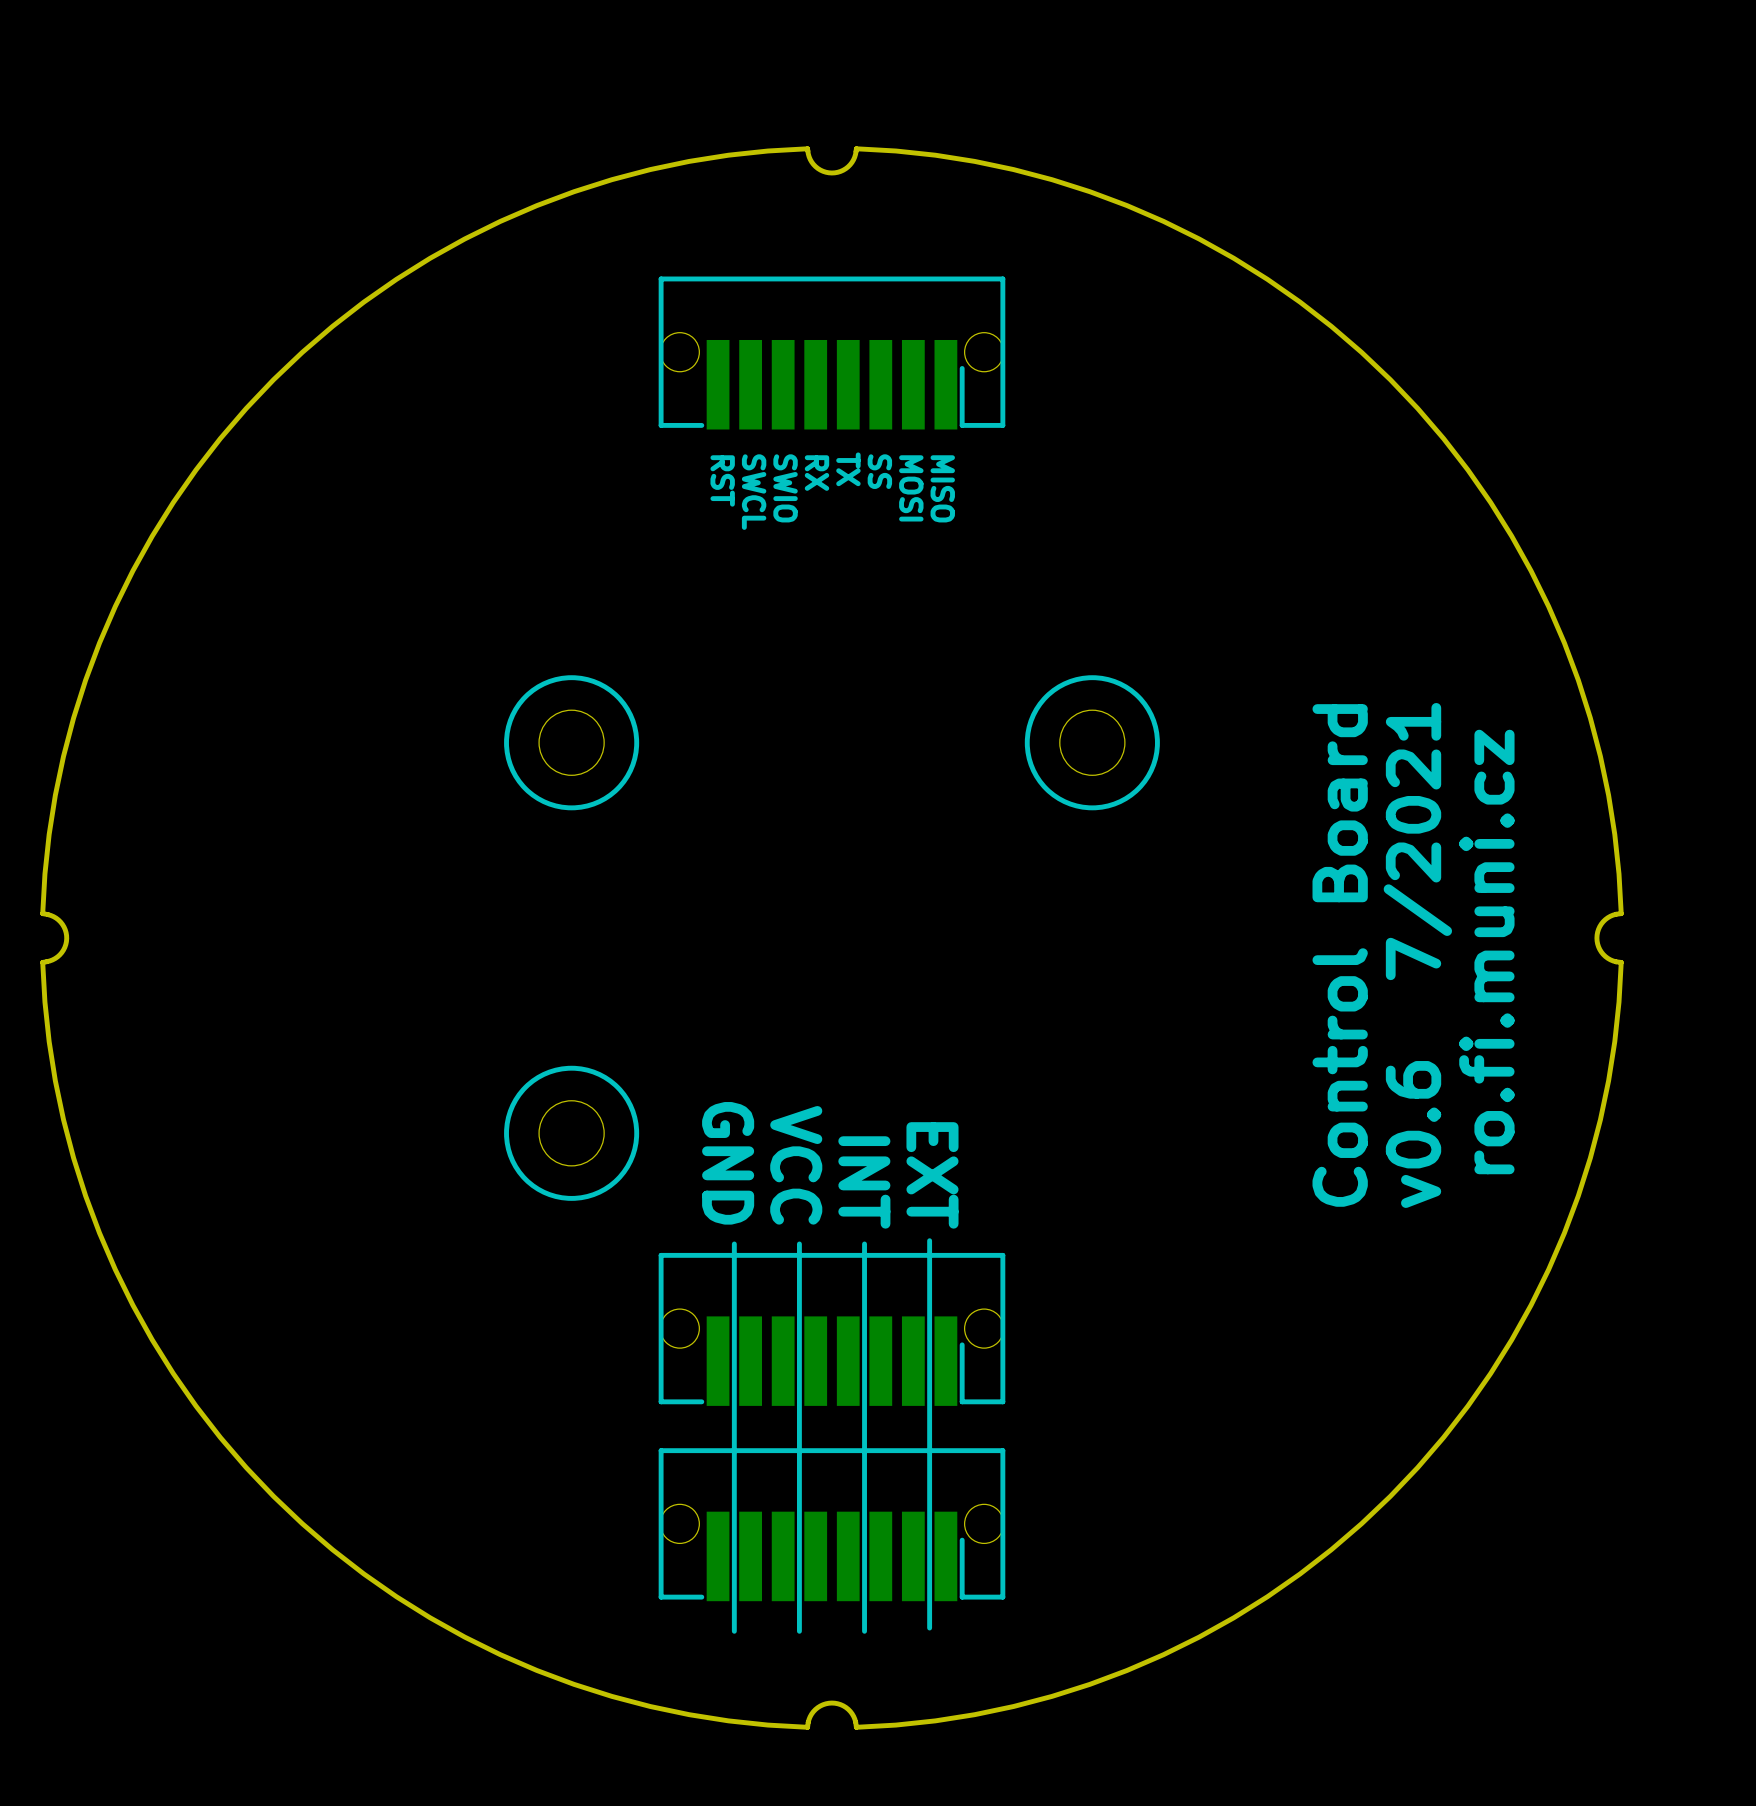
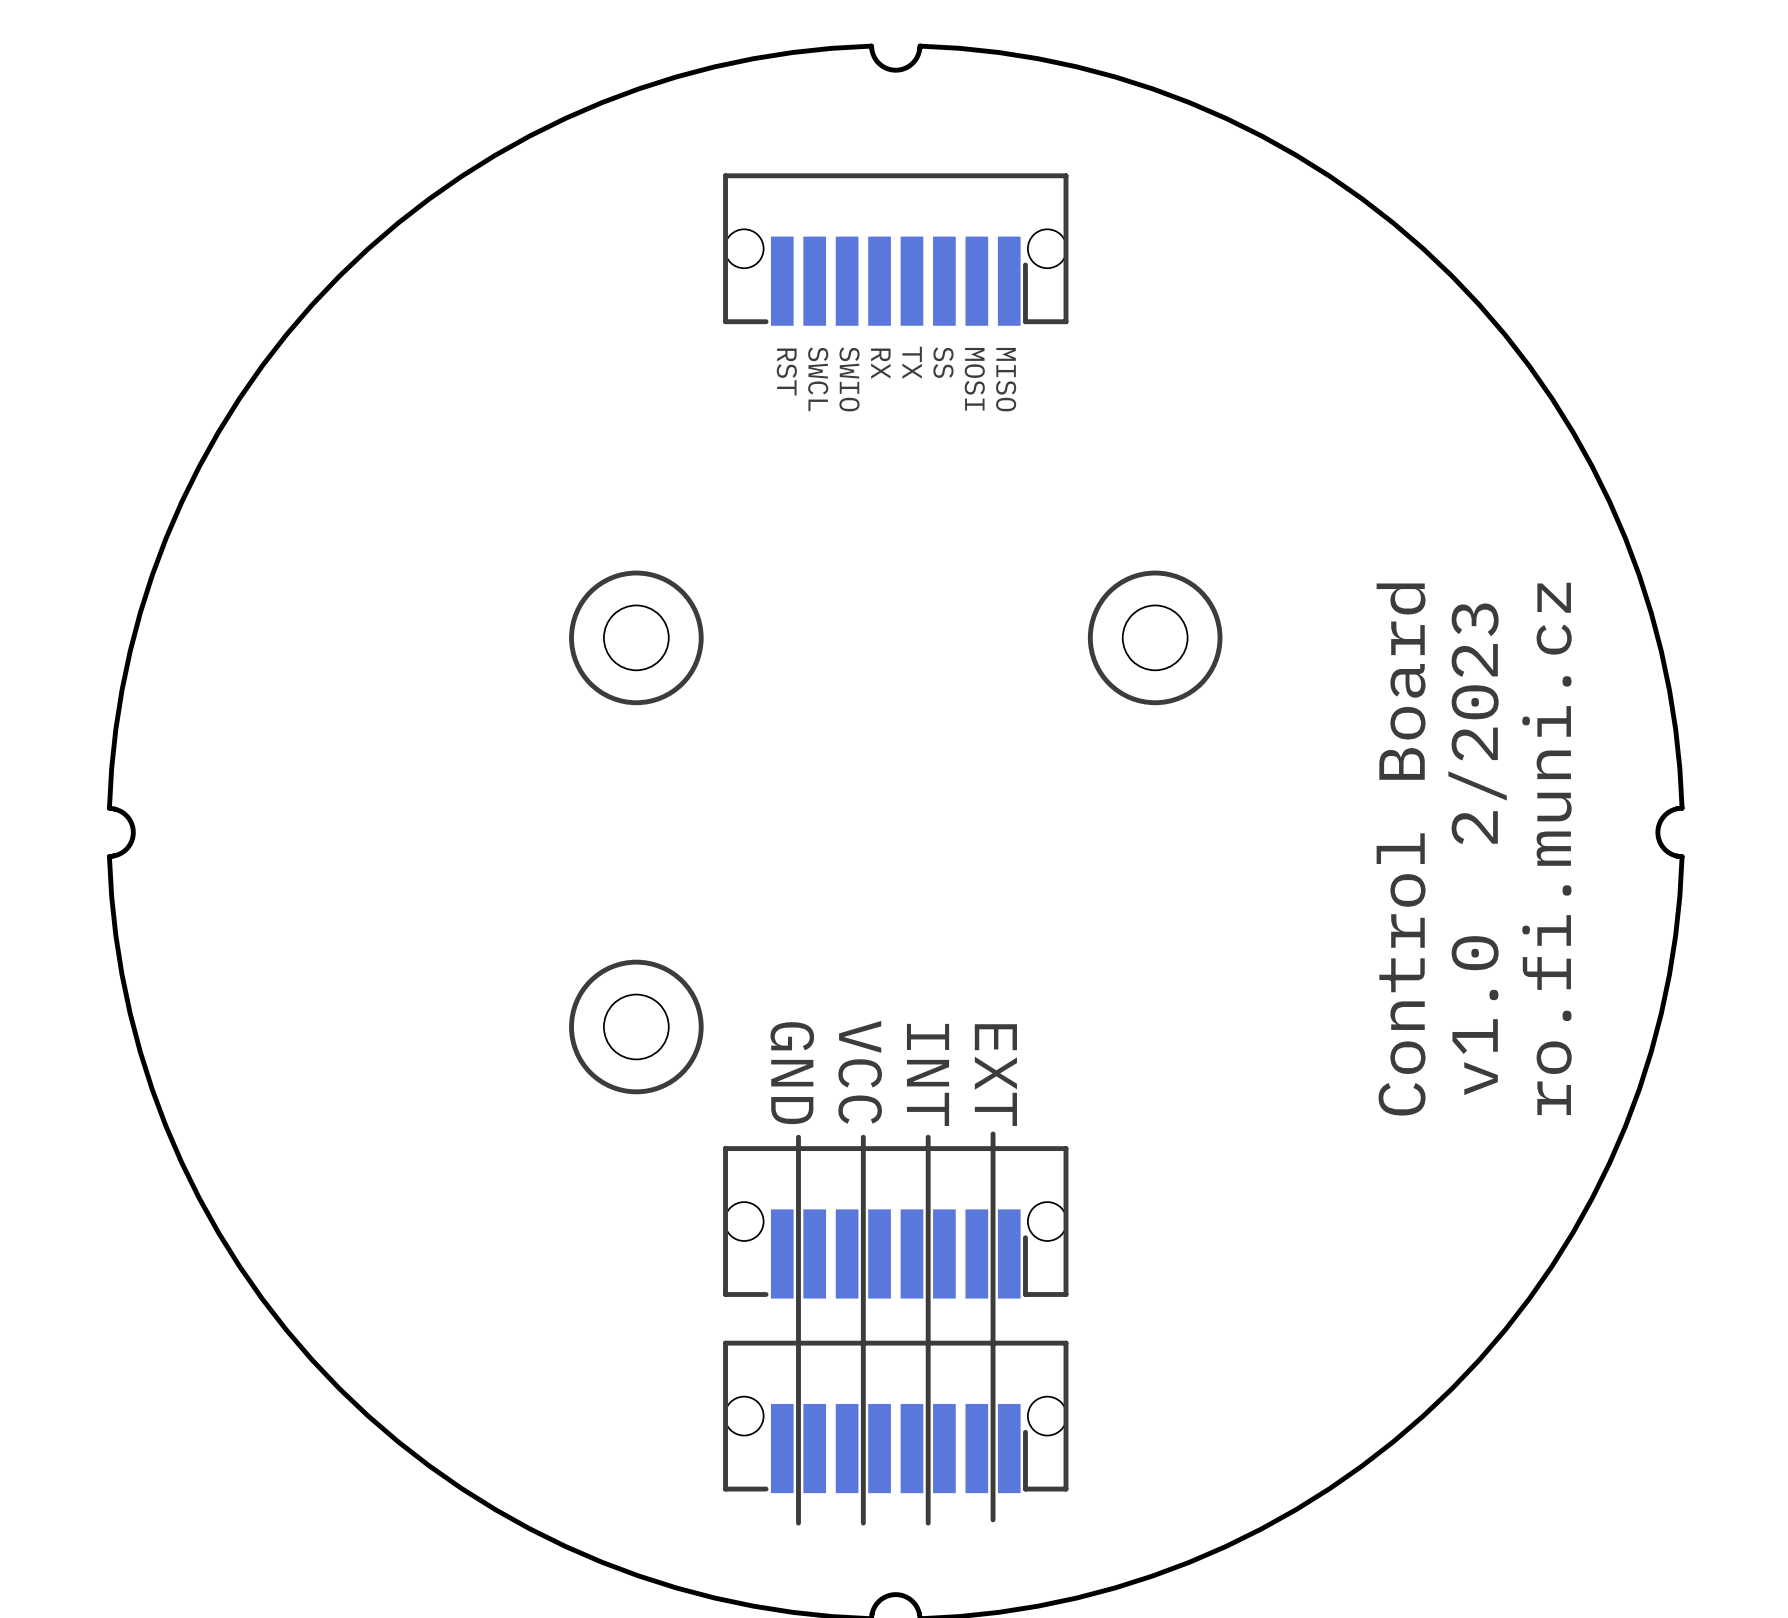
text: v0.6 7/2021 (1417, 955) -> v1.0 2/2023 (1477, 849)

